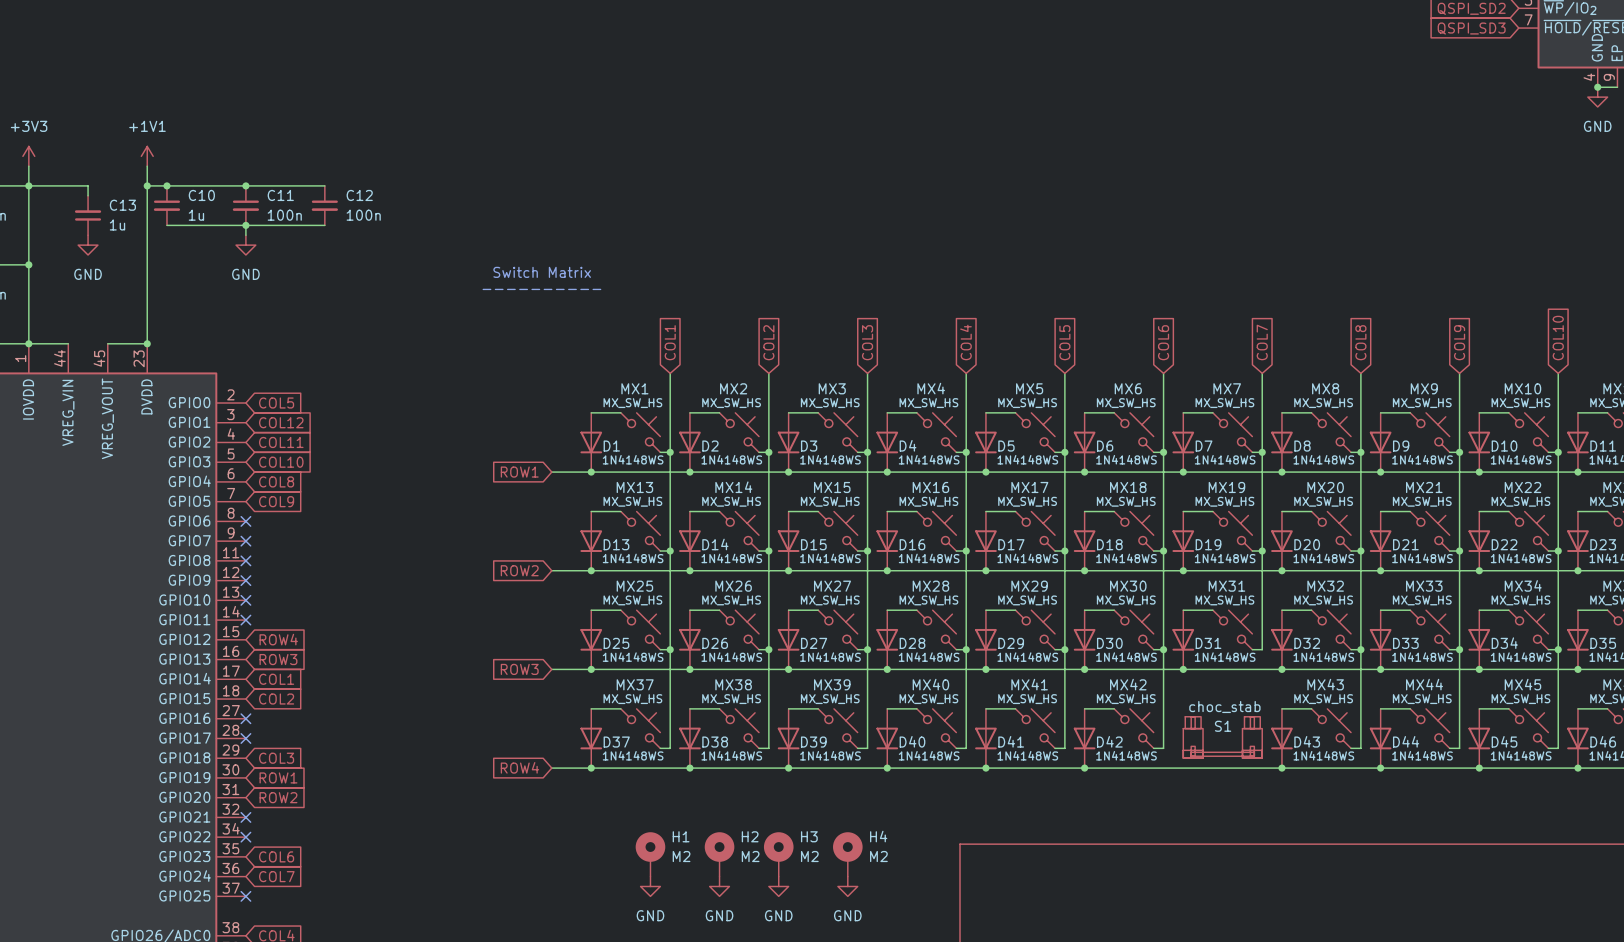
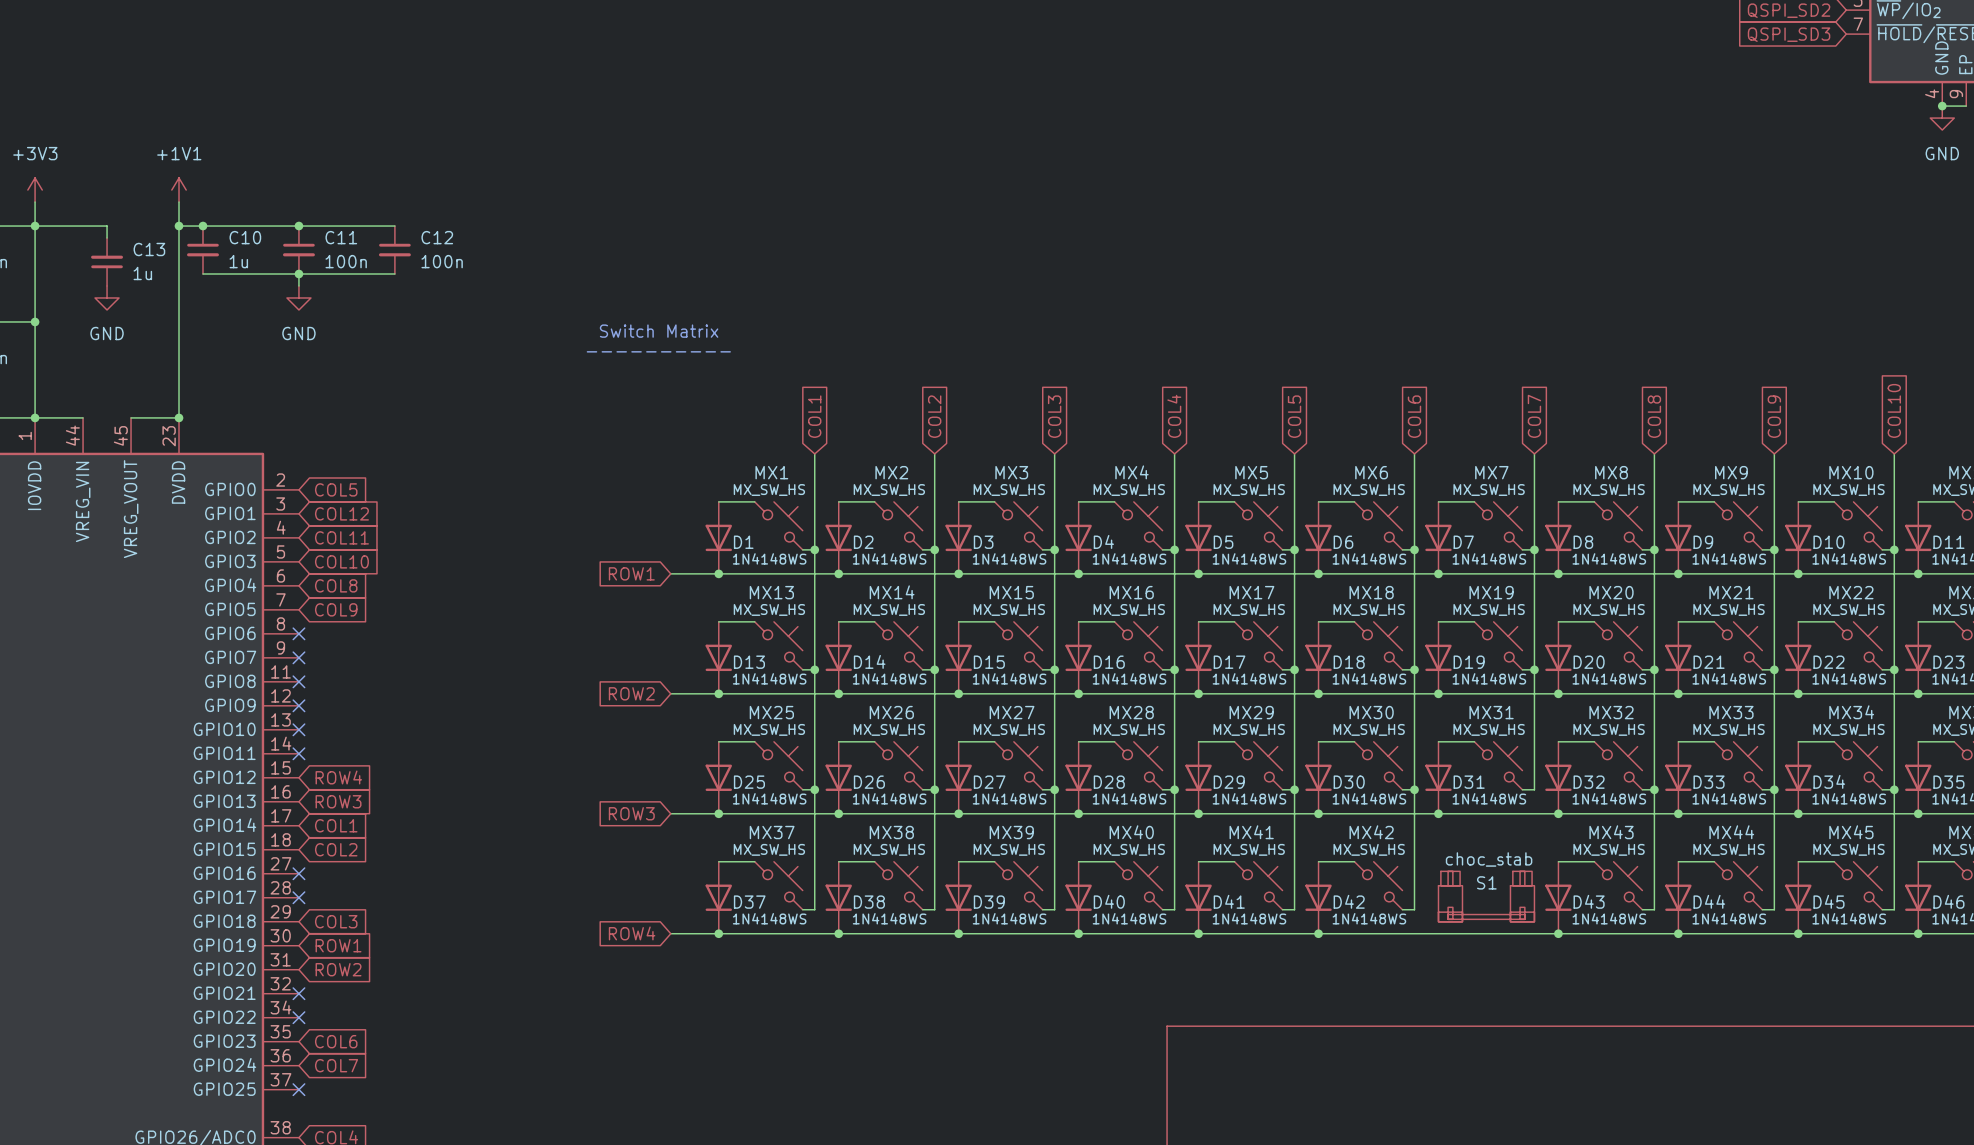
H1: M2 (650, 854) -> none
H2: M2 (719, 854) -> none
H3: M2 (778, 854) -> none
H4: M2 (847, 854) -> none
power symbol: GND (650, 886) -> none
power symbol: GND (719, 886) -> none
power symbol: GND (778, 886) -> none
power symbol: GND (847, 886) -> none

